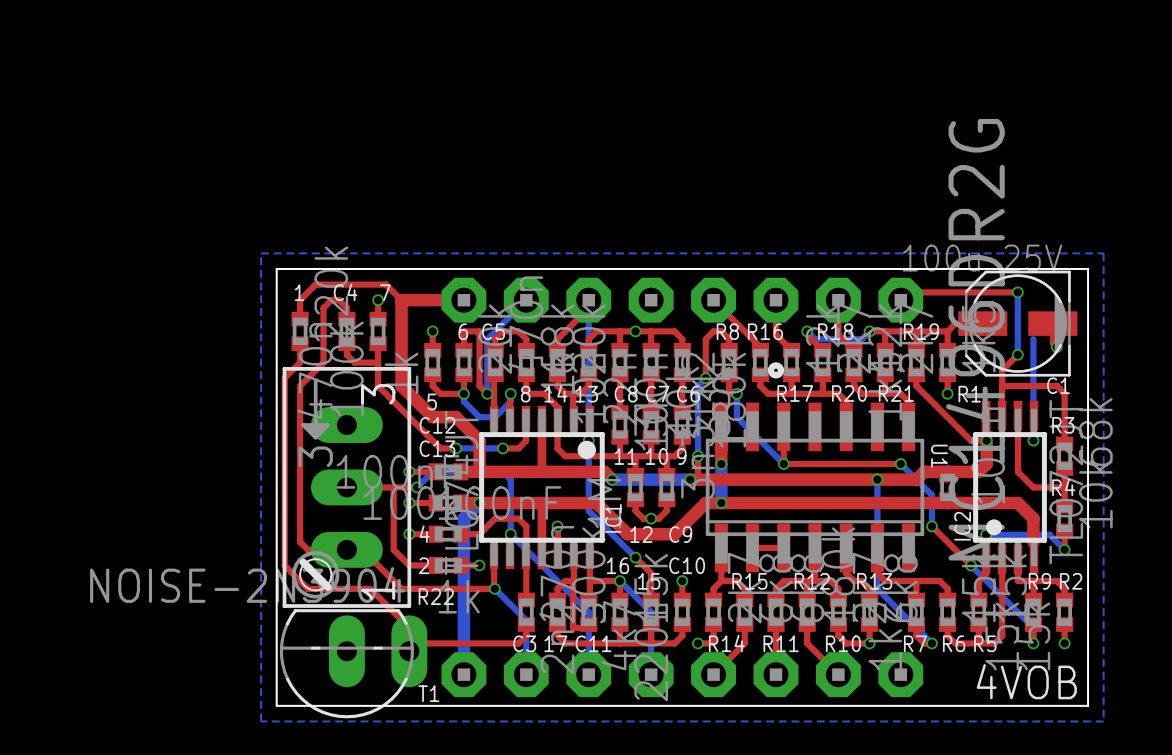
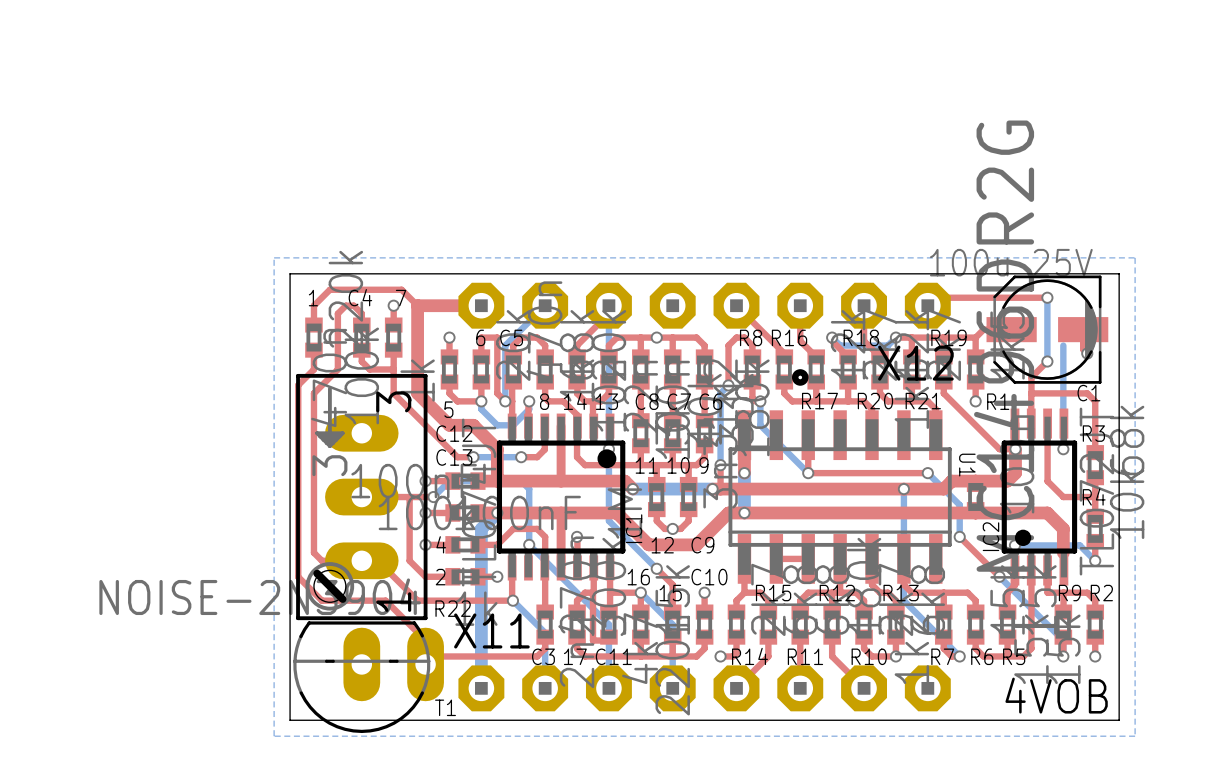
X12 name: none -> X12 (915, 363)
X11 name: none -> X11 (491, 630)

